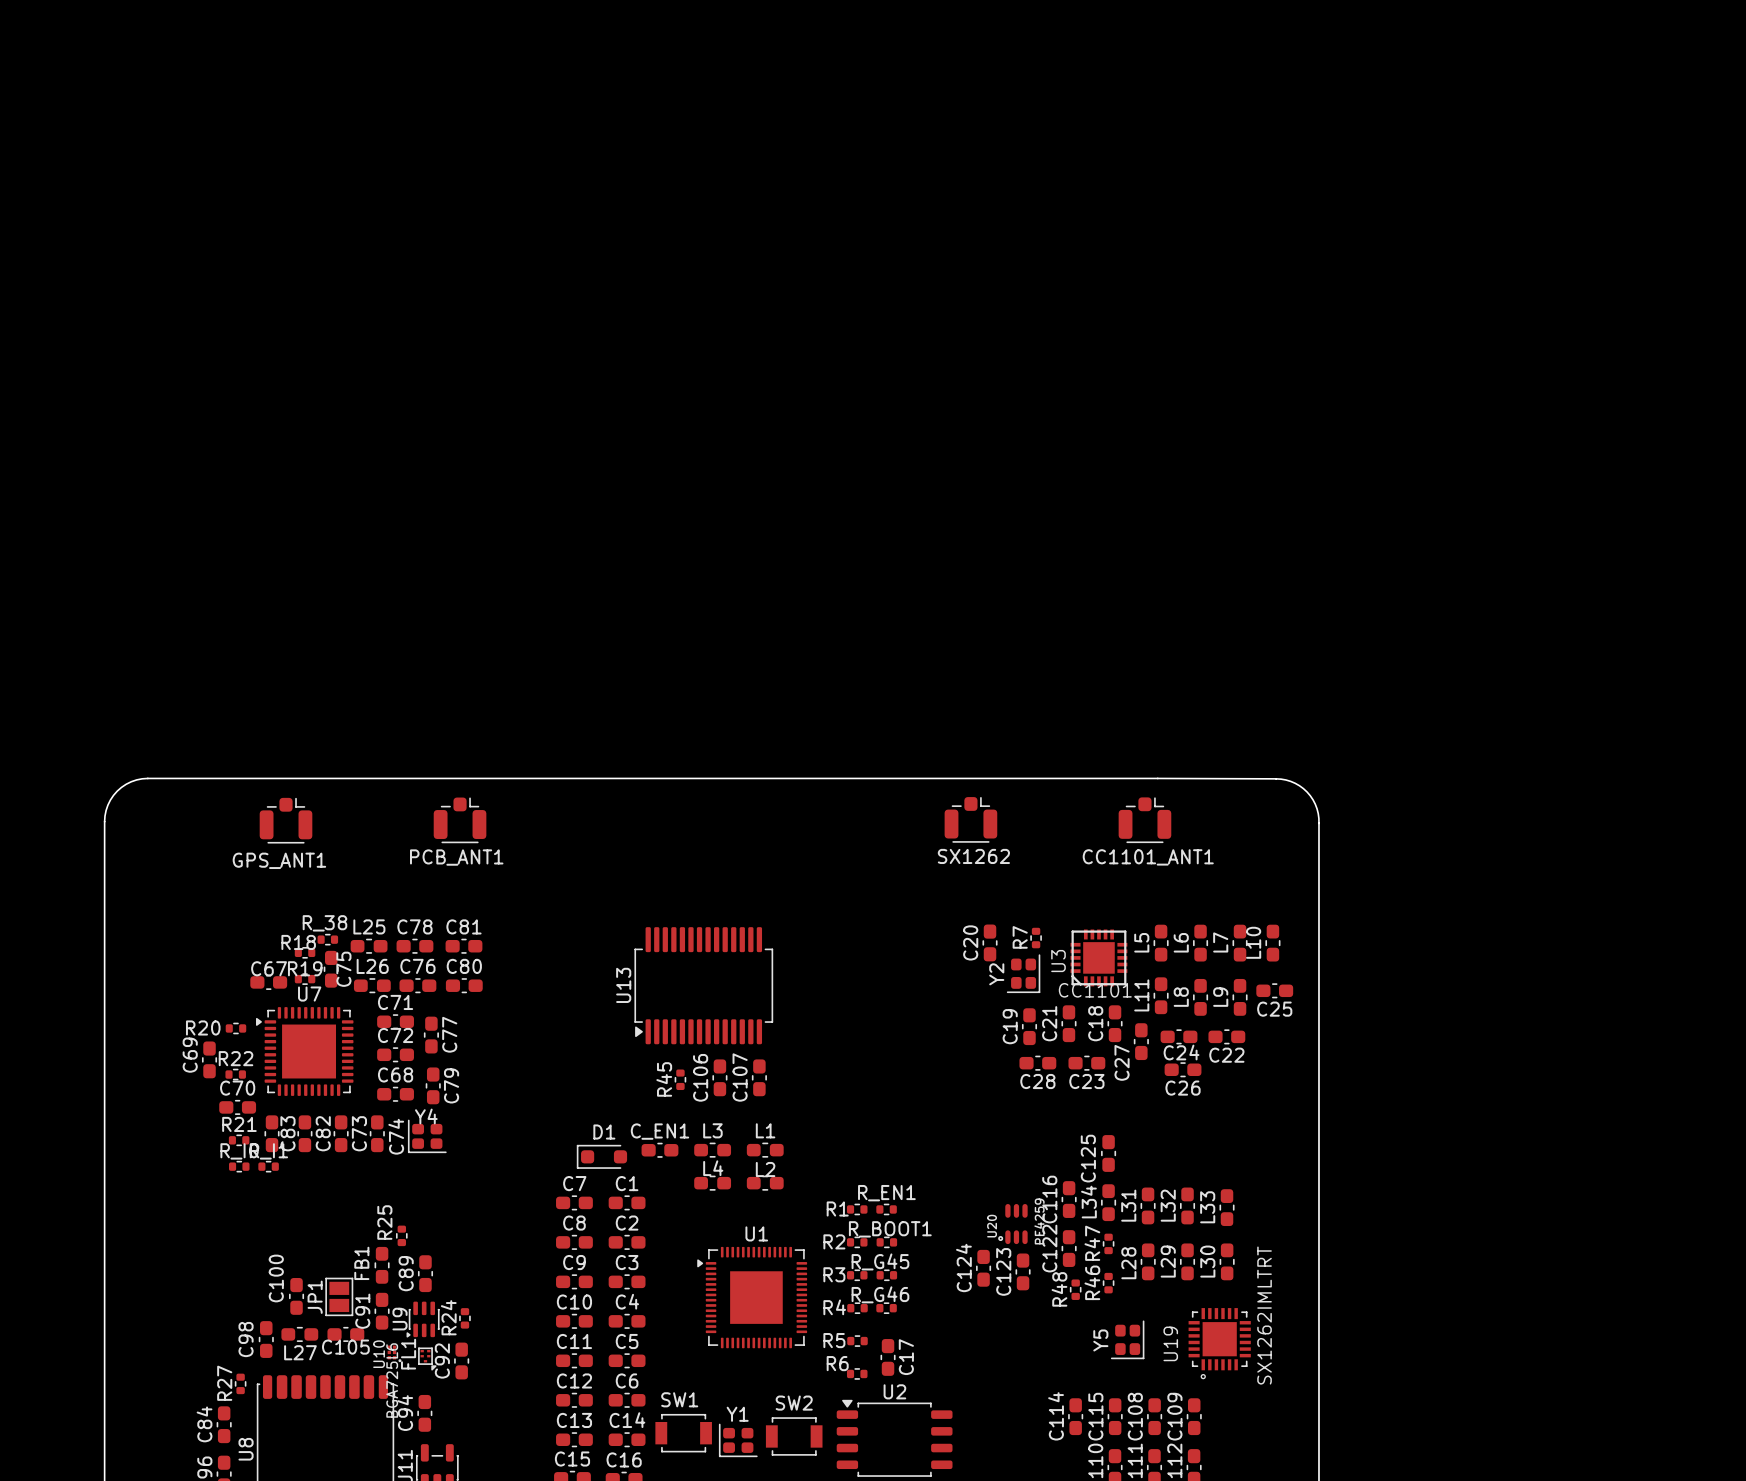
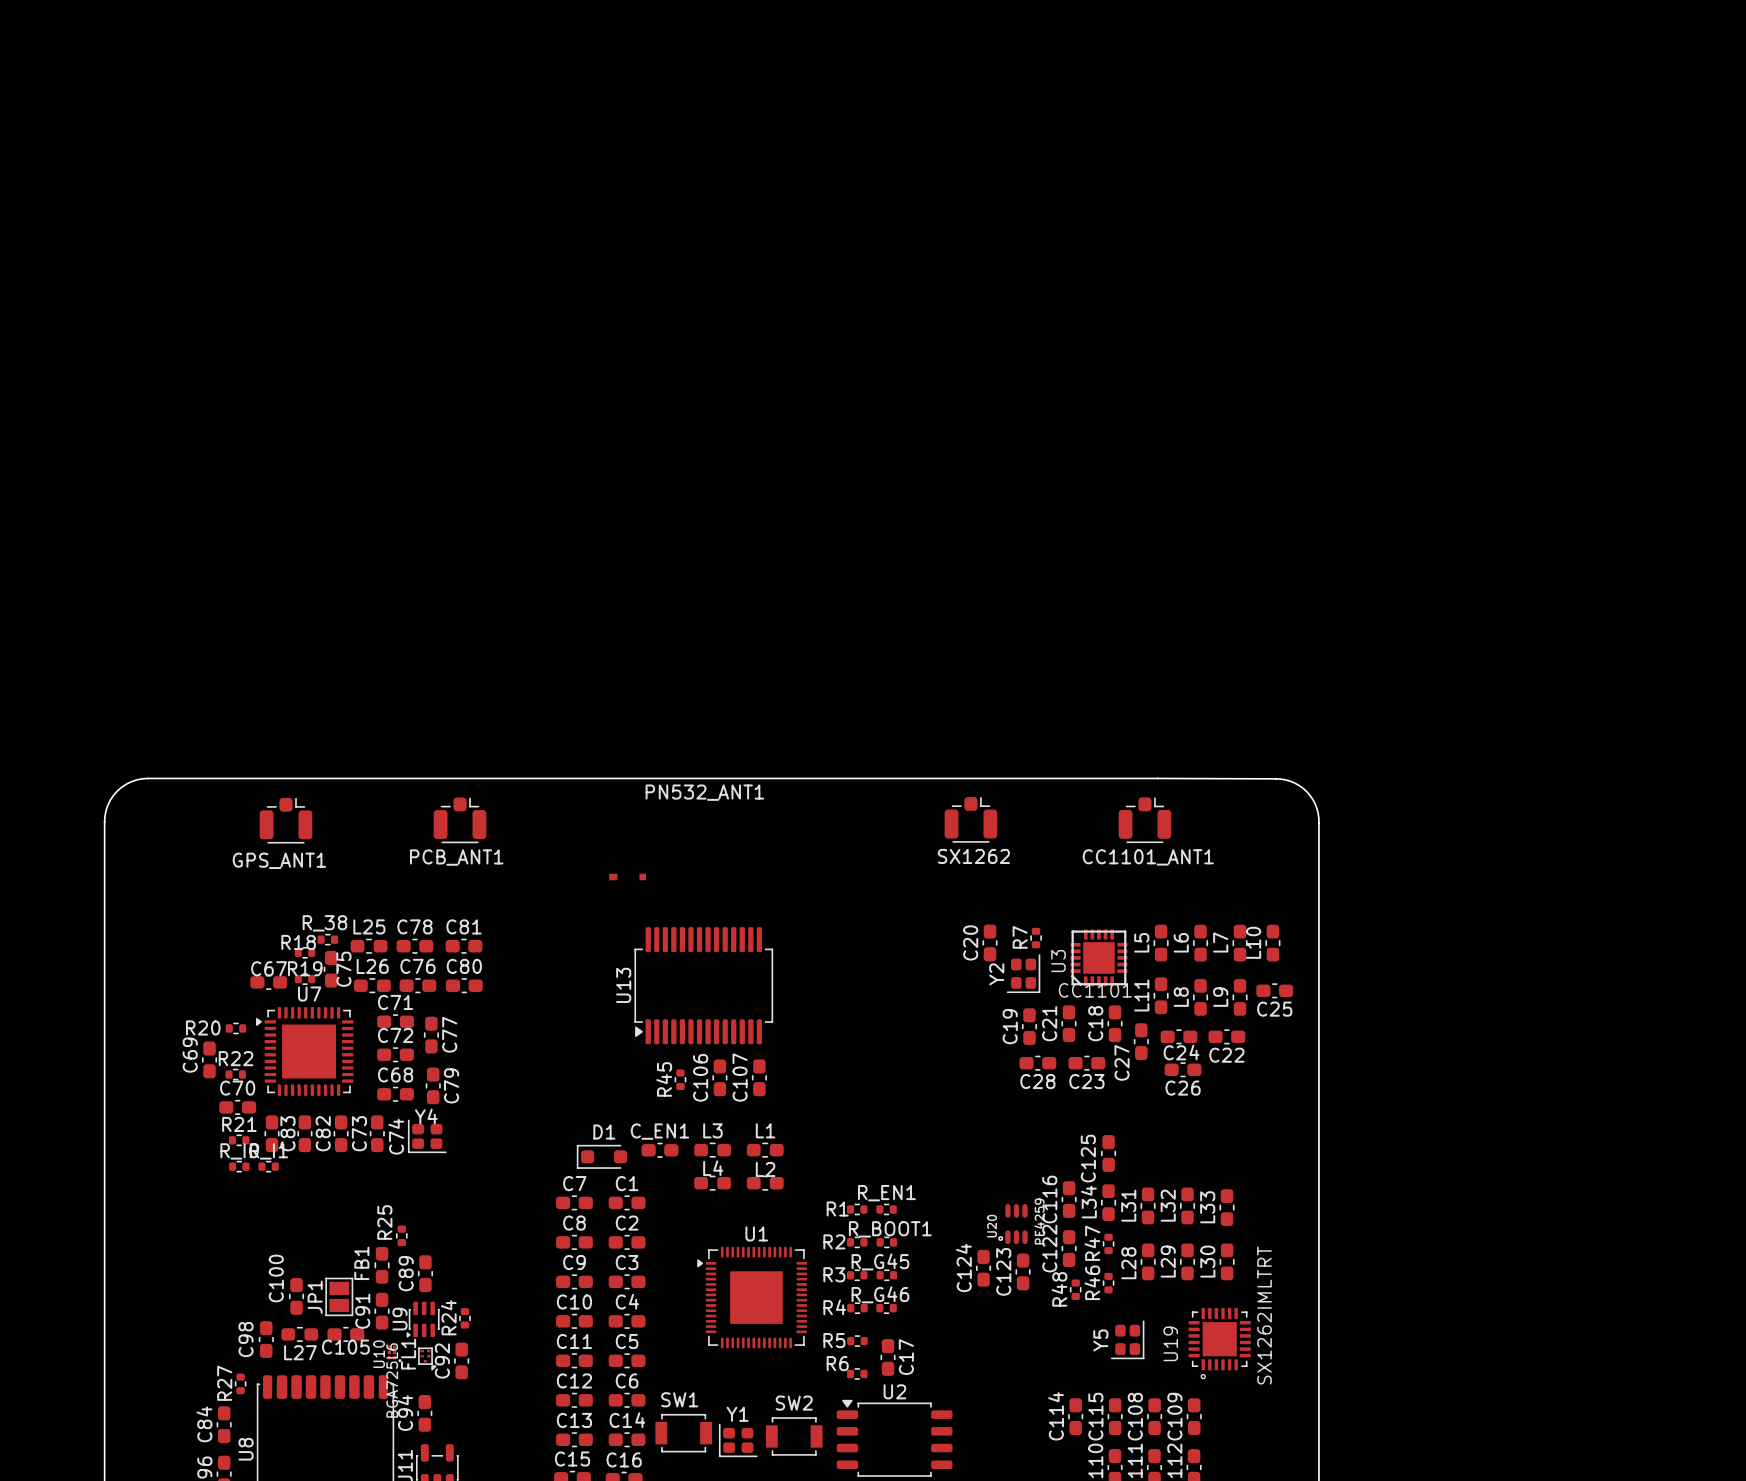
PN532_ANT1: none -> (627, 877)

